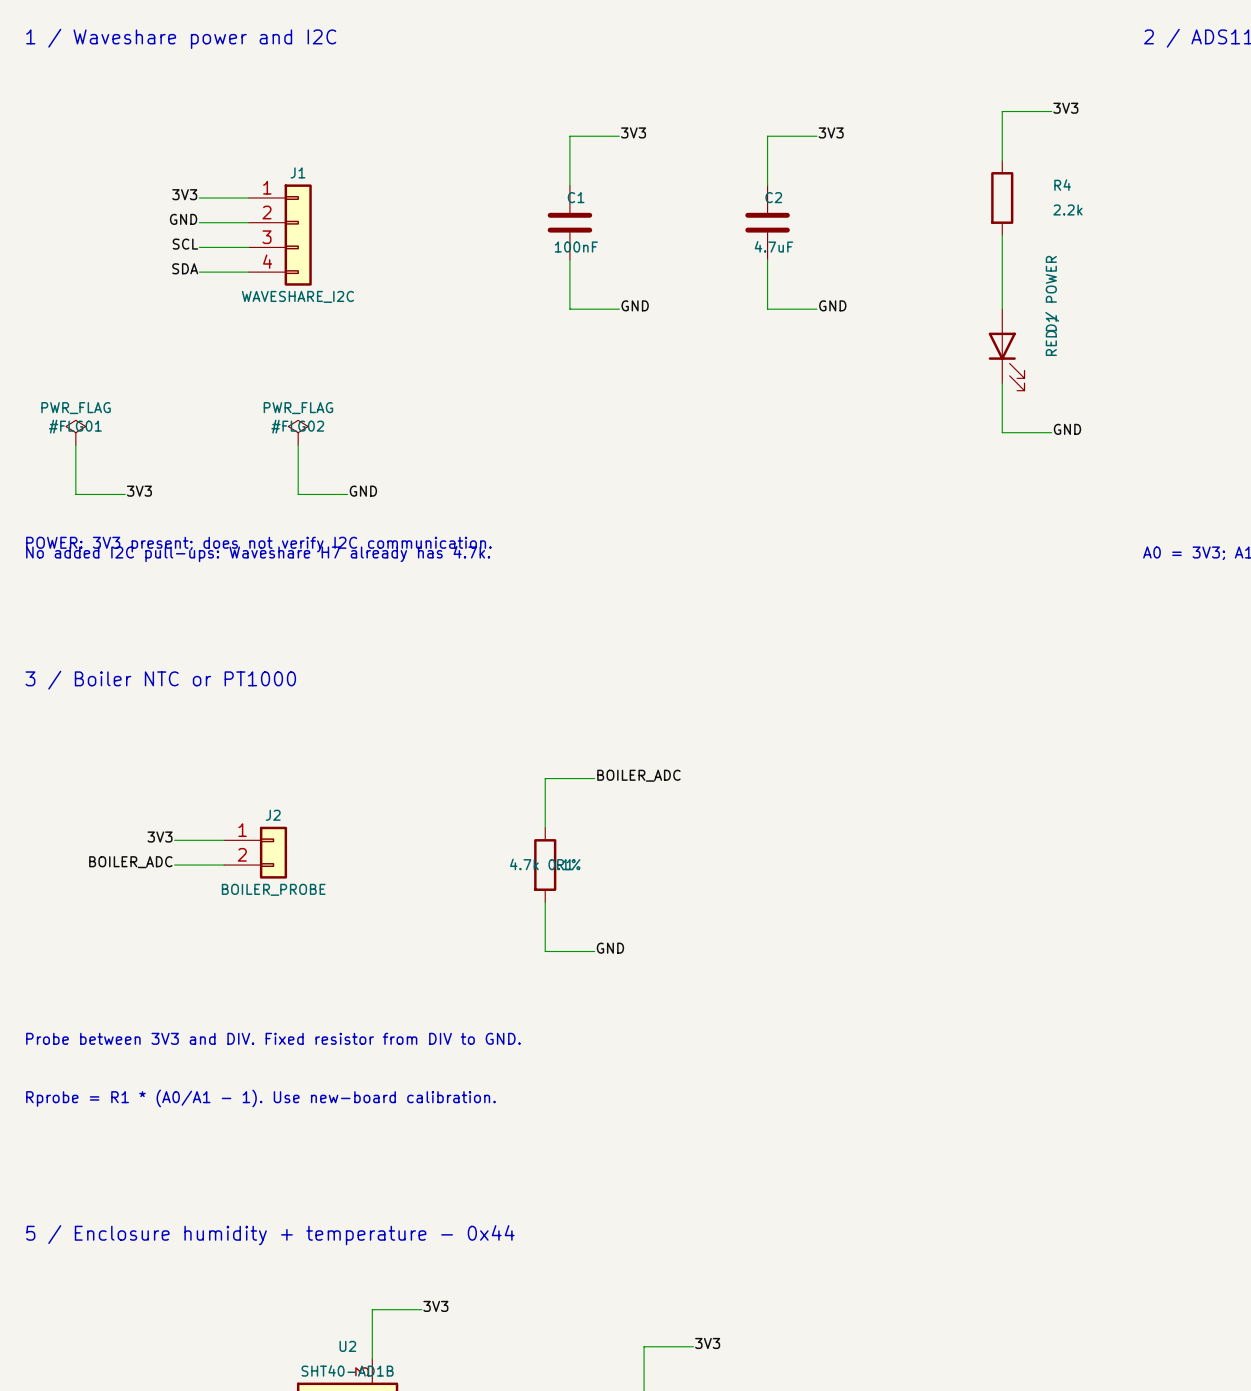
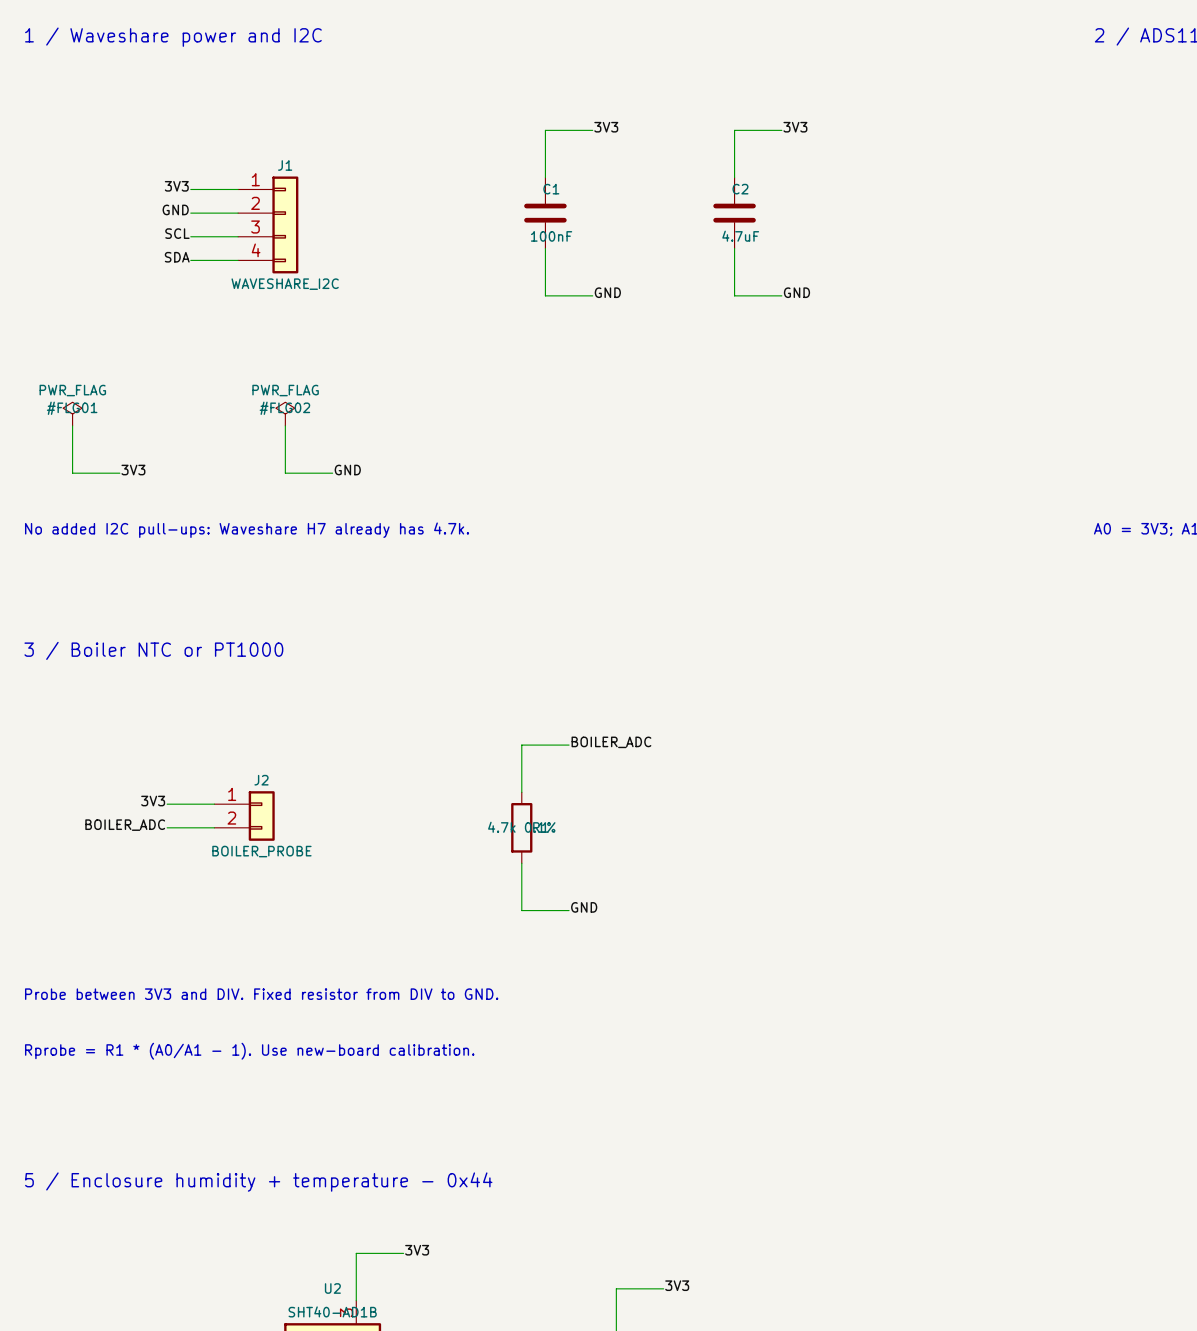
label: 3V3 (1065, 108) -> none
wire: (1051, 111) (1002, 111) (1002, 160) -> none
R4: 2.2k (1002, 197) -> none
wire: (1002, 235) (1002, 309) -> none
D1: RED / POWER (1006, 349) -> none
wire: (1002, 383) (1002, 432) (1051, 432) -> none
label: GND (1067, 429) -> none
text: POWER: 3V3 present; does not verify I2C communication. (258, 544) -> none

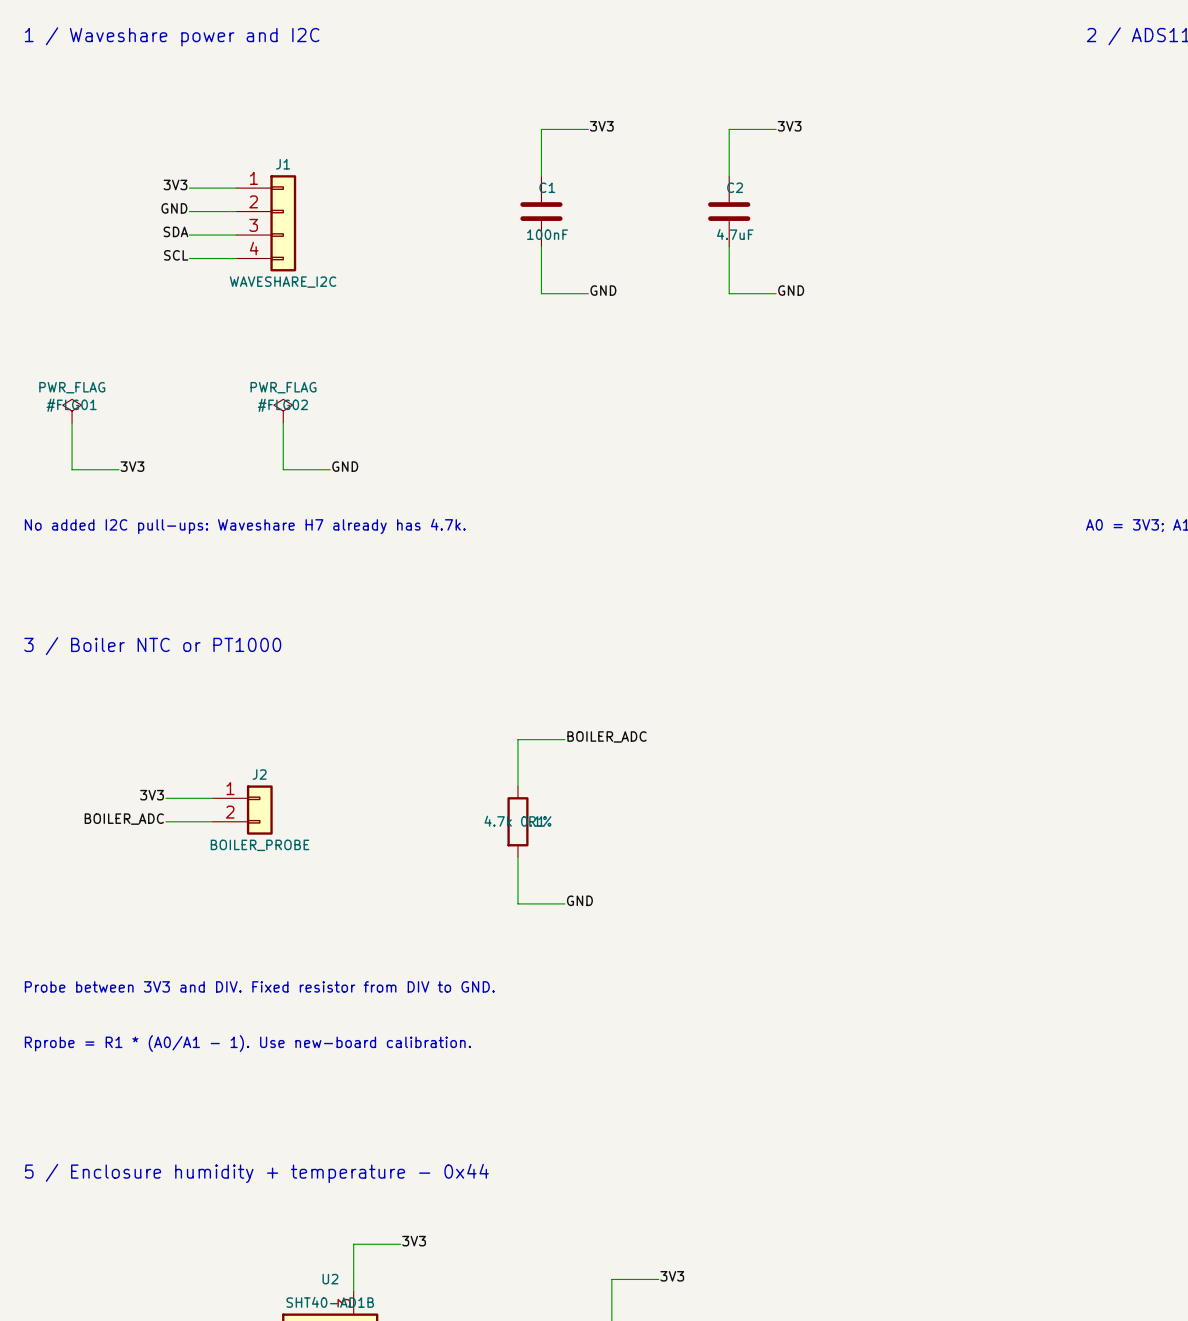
label: SCL (177, 233) -> SDA (175, 231)
label: SDA (177, 257) -> SCL (176, 255)

